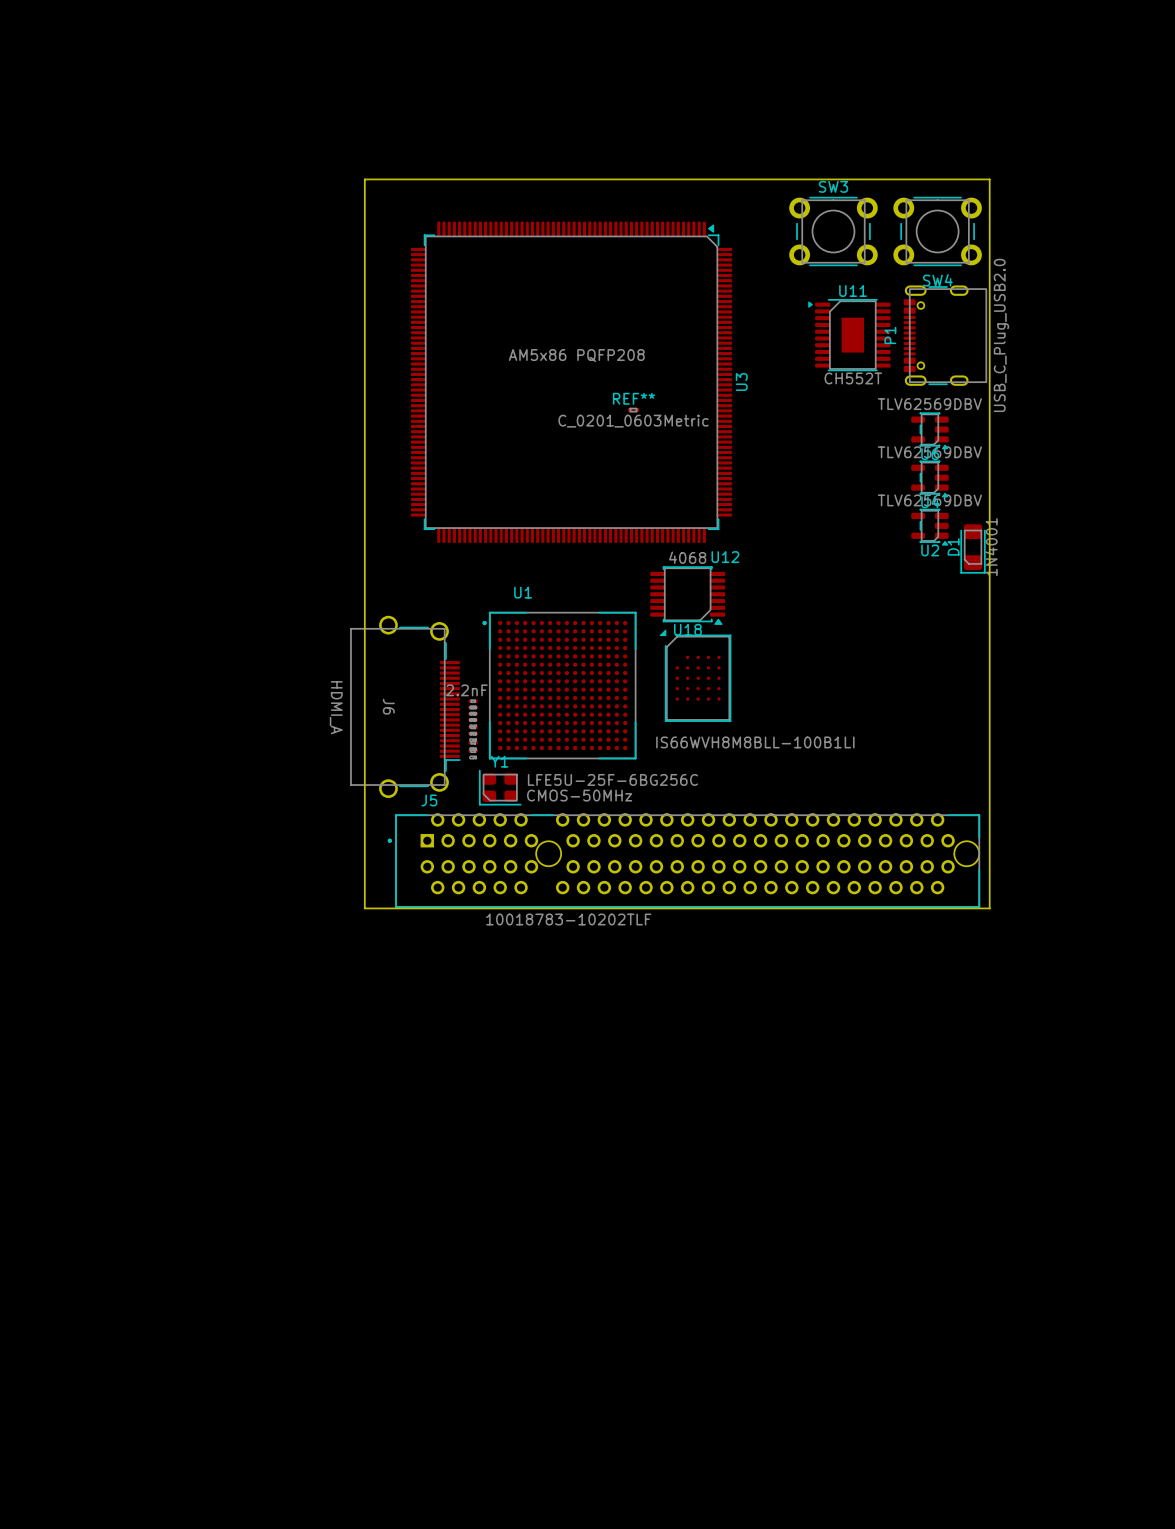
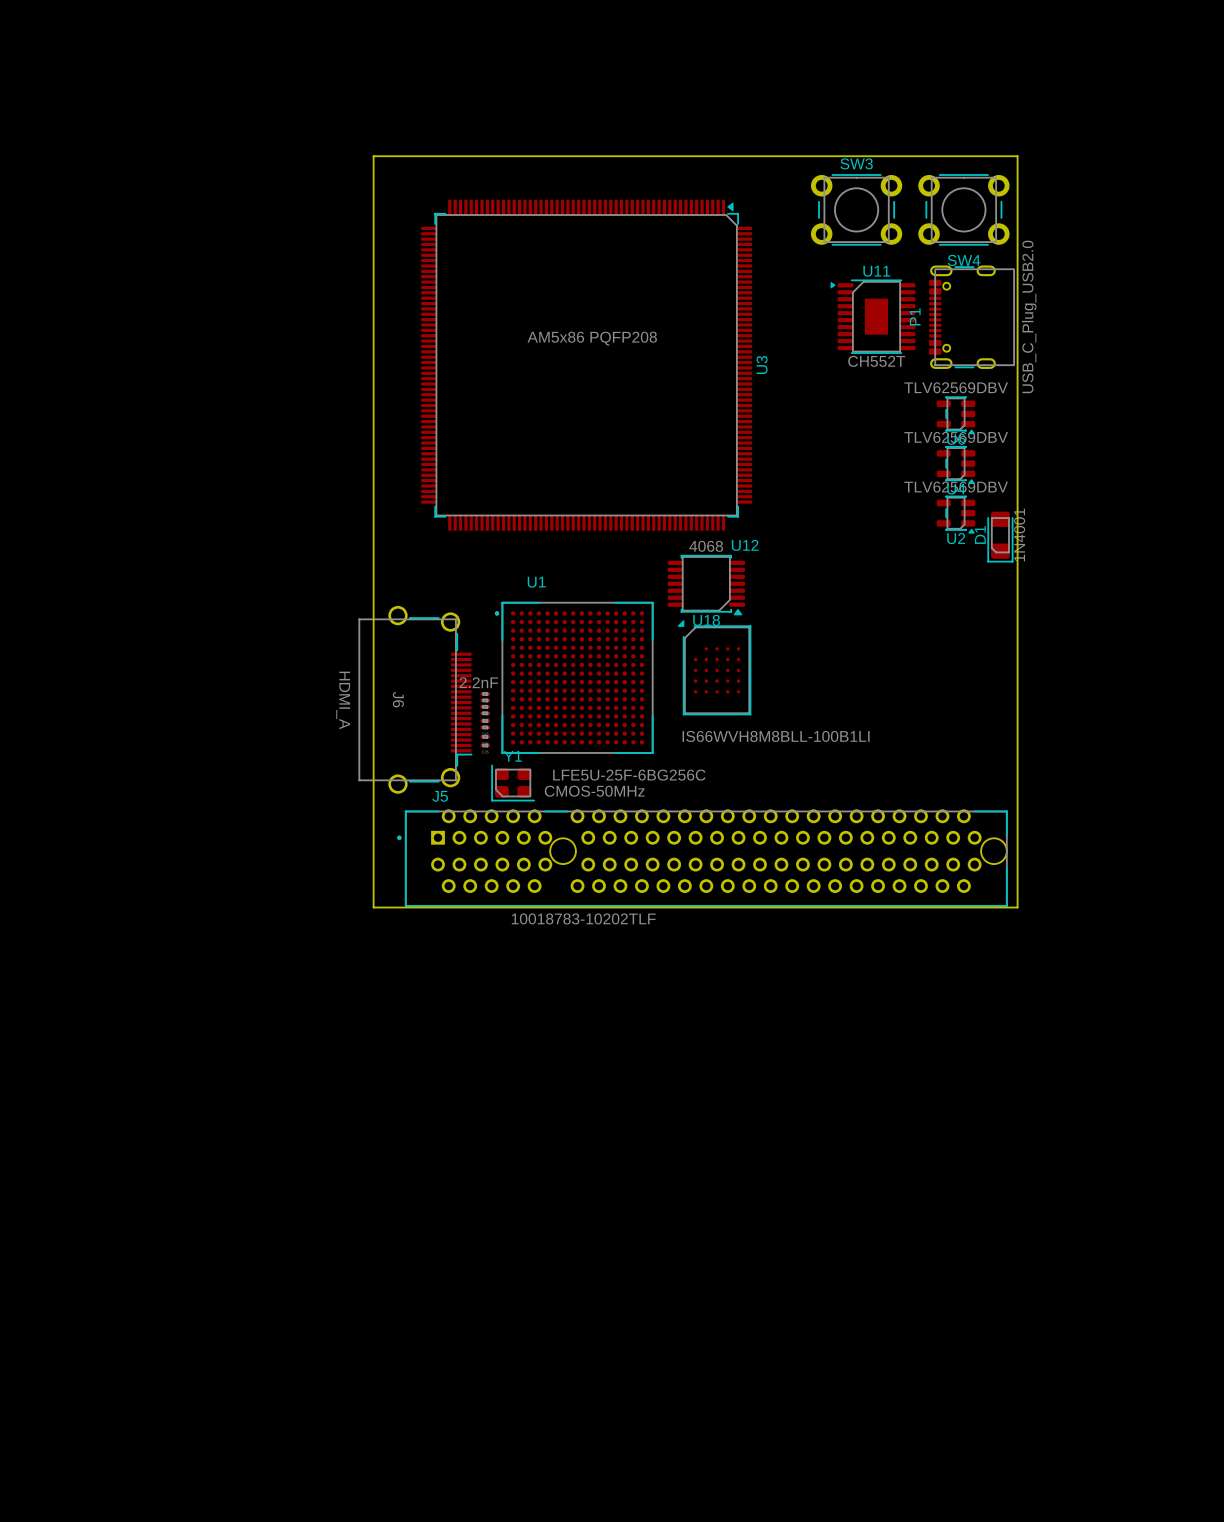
REF**: C_0201_0603Metric (633, 410) -> none

